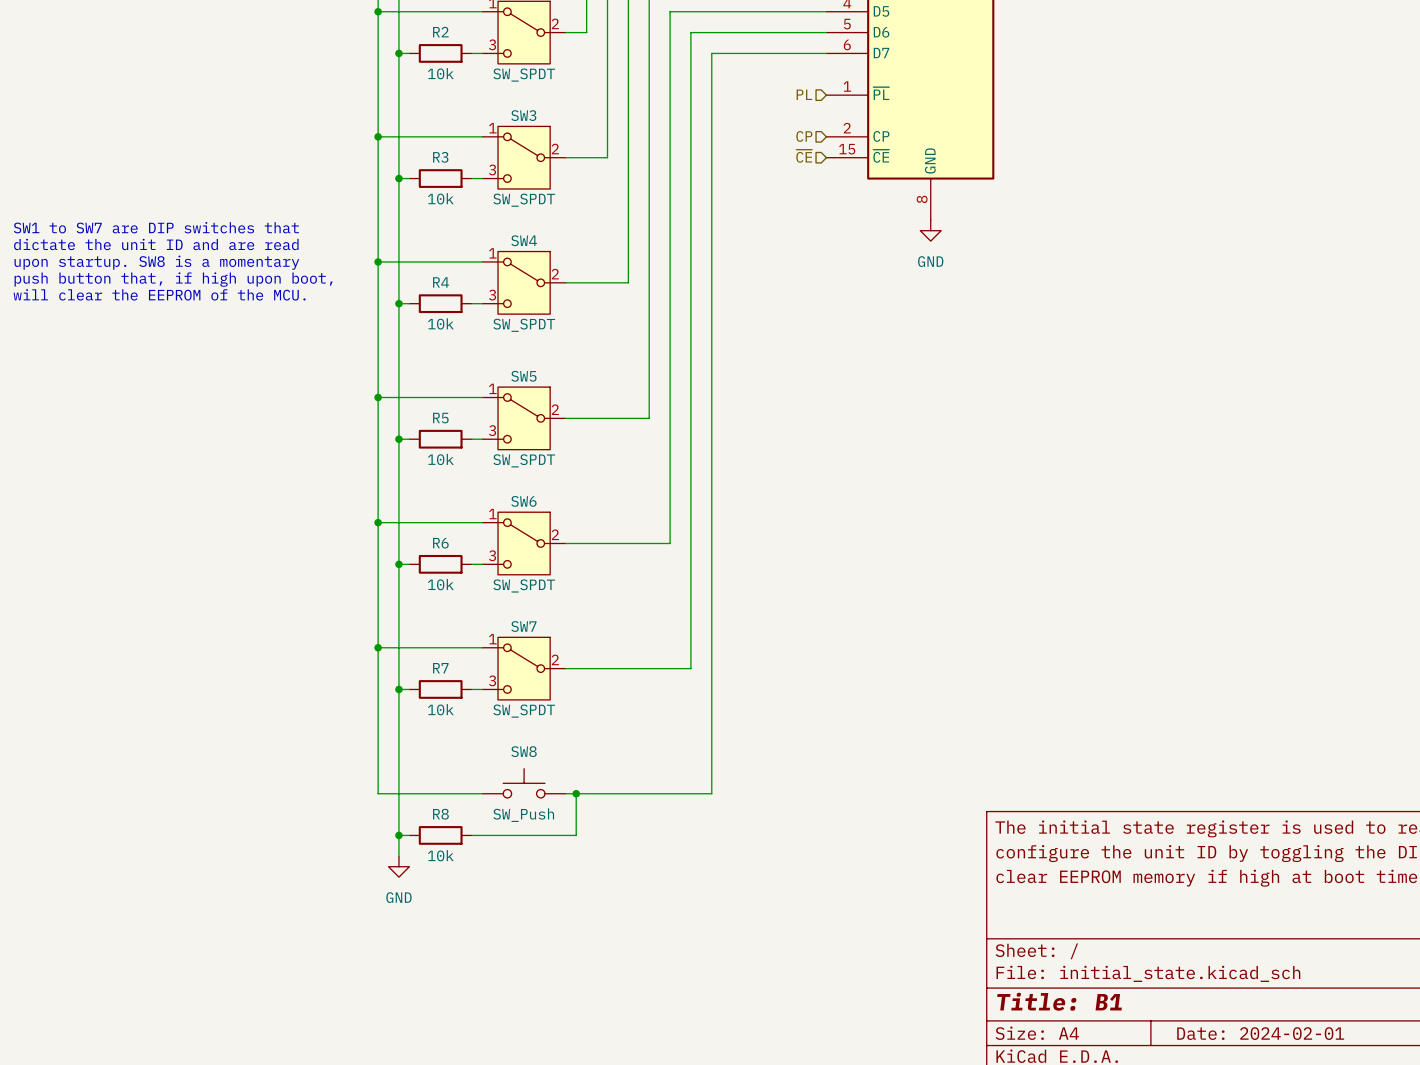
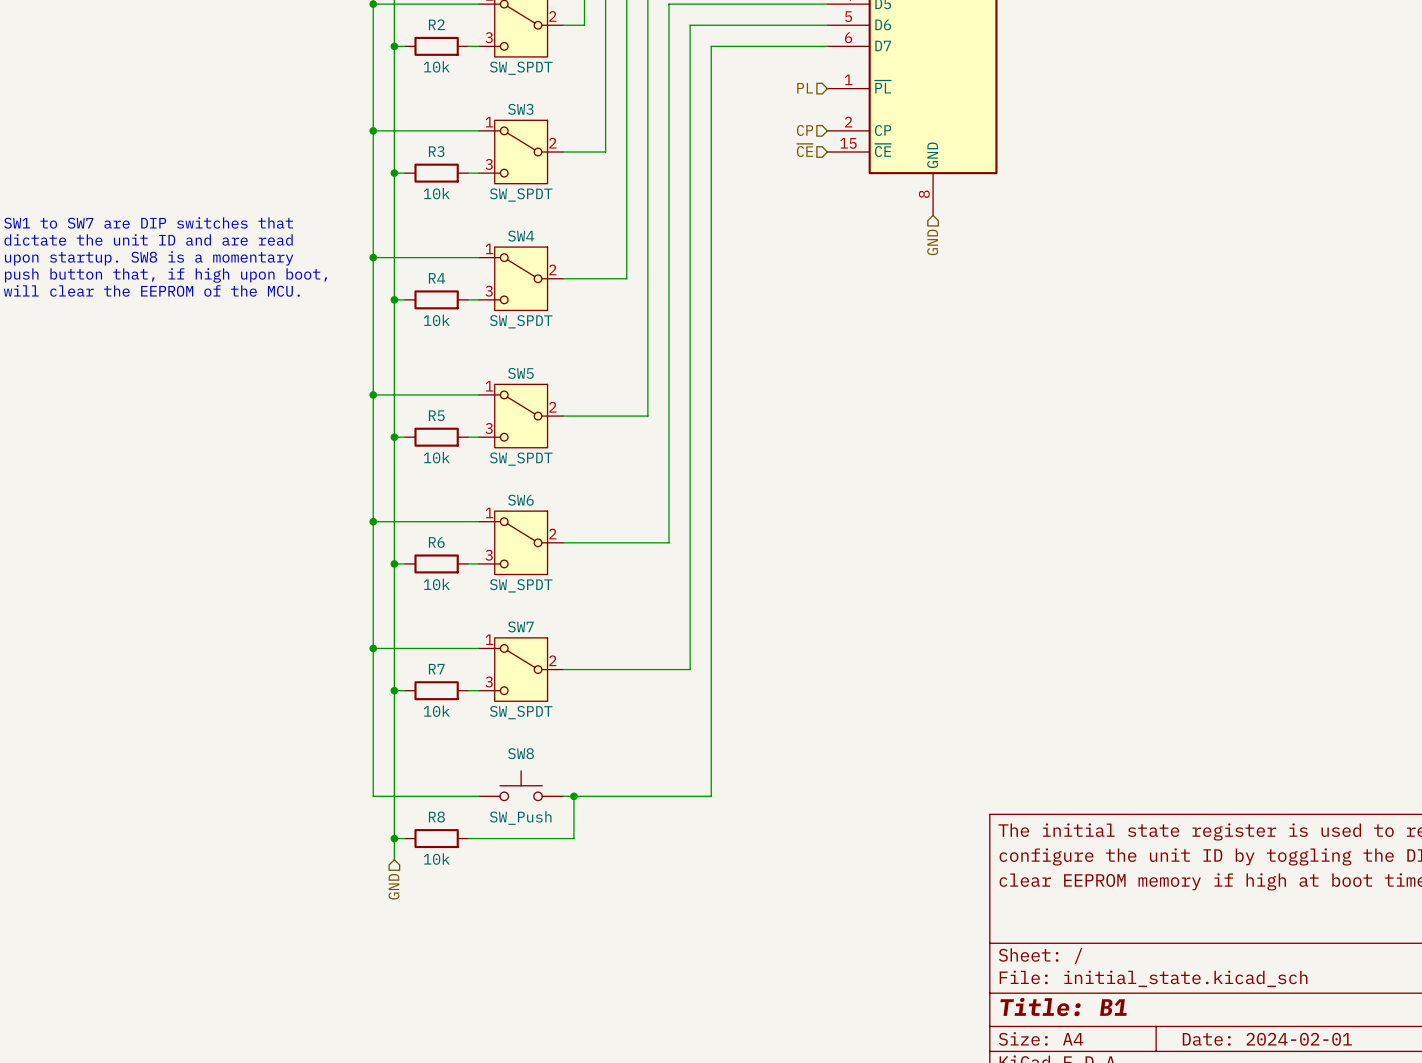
power symbol: GND (930, 230) -> none
hierarchical label: none -> GND (932, 242)
power symbol: GND (398, 866) -> none
hierarchical label: none -> GND (393, 886)

